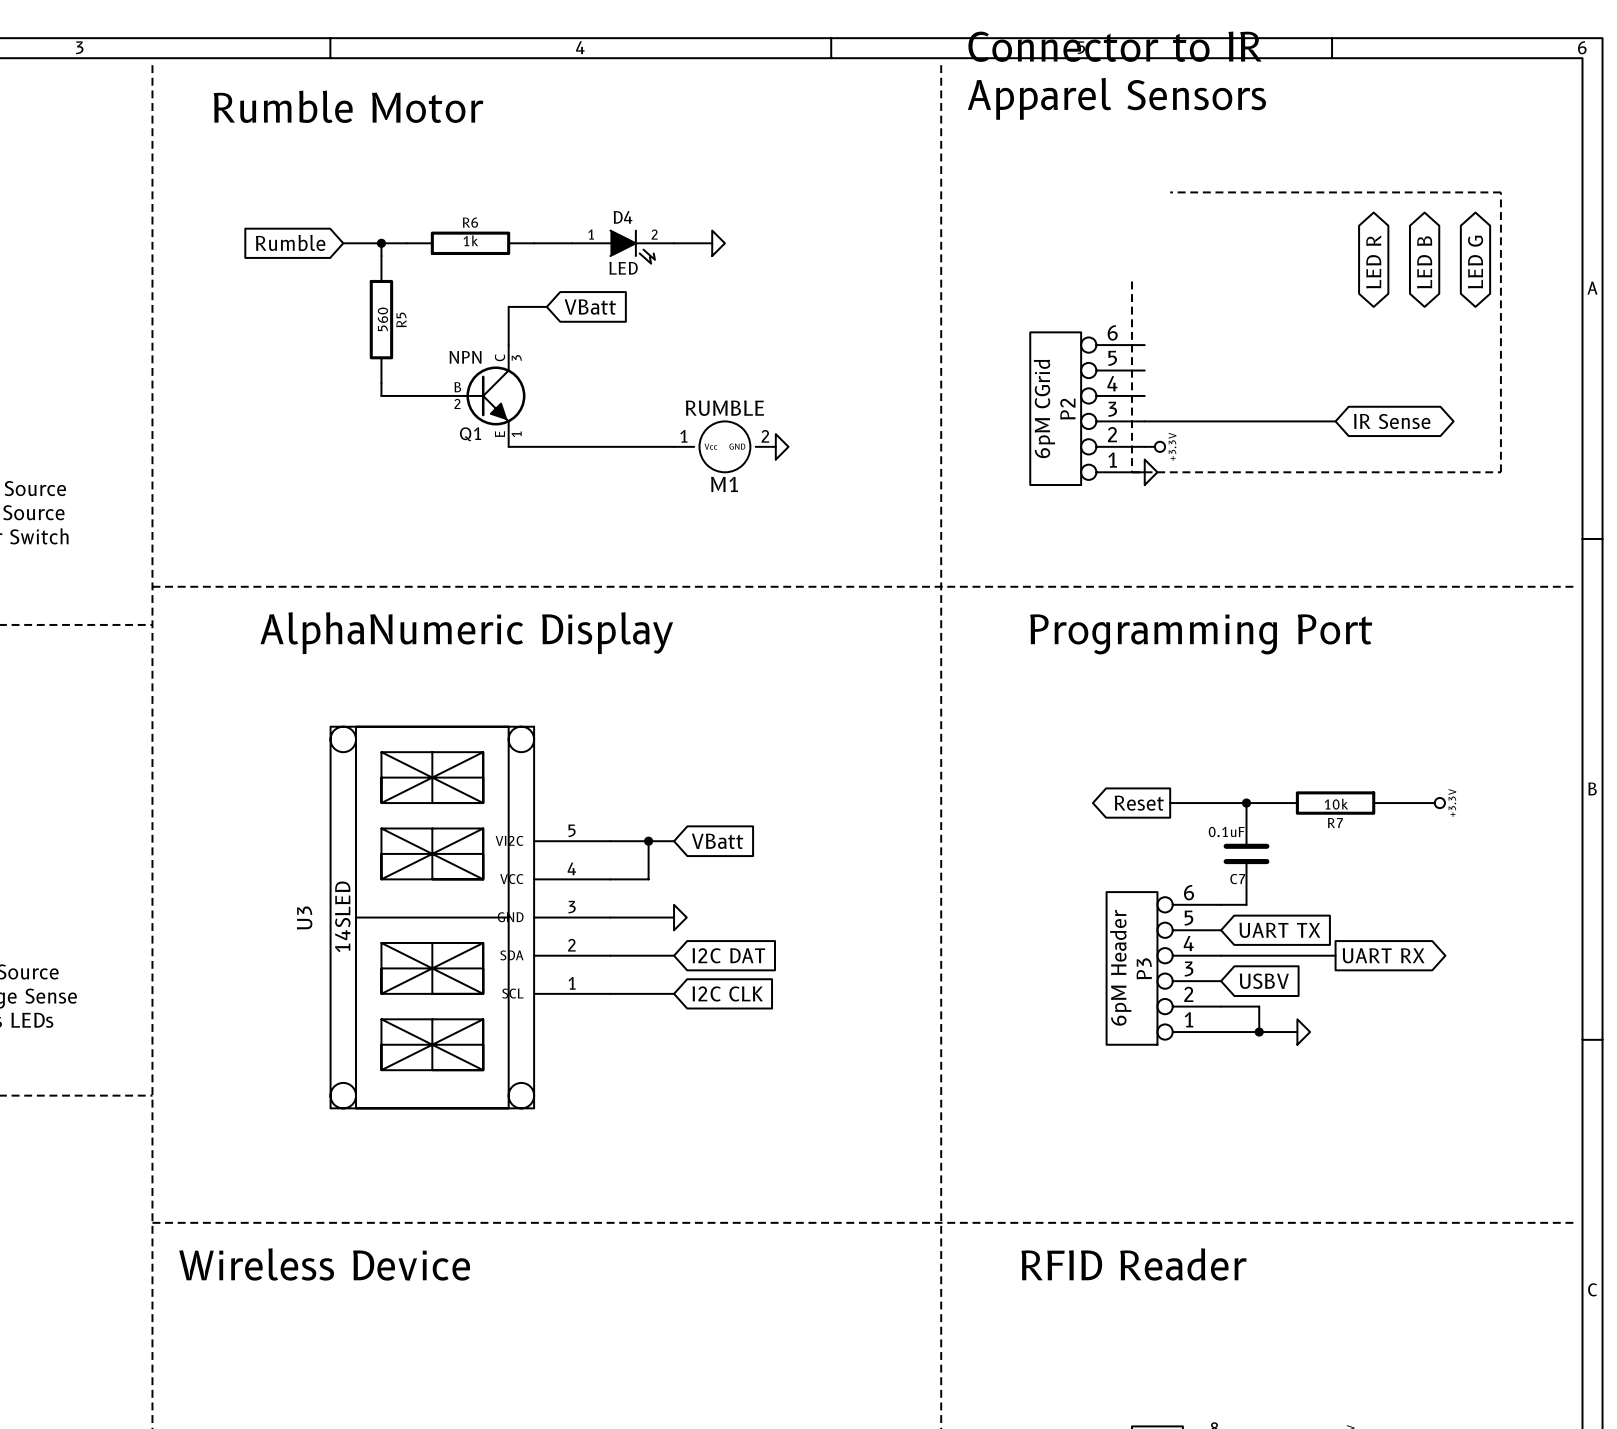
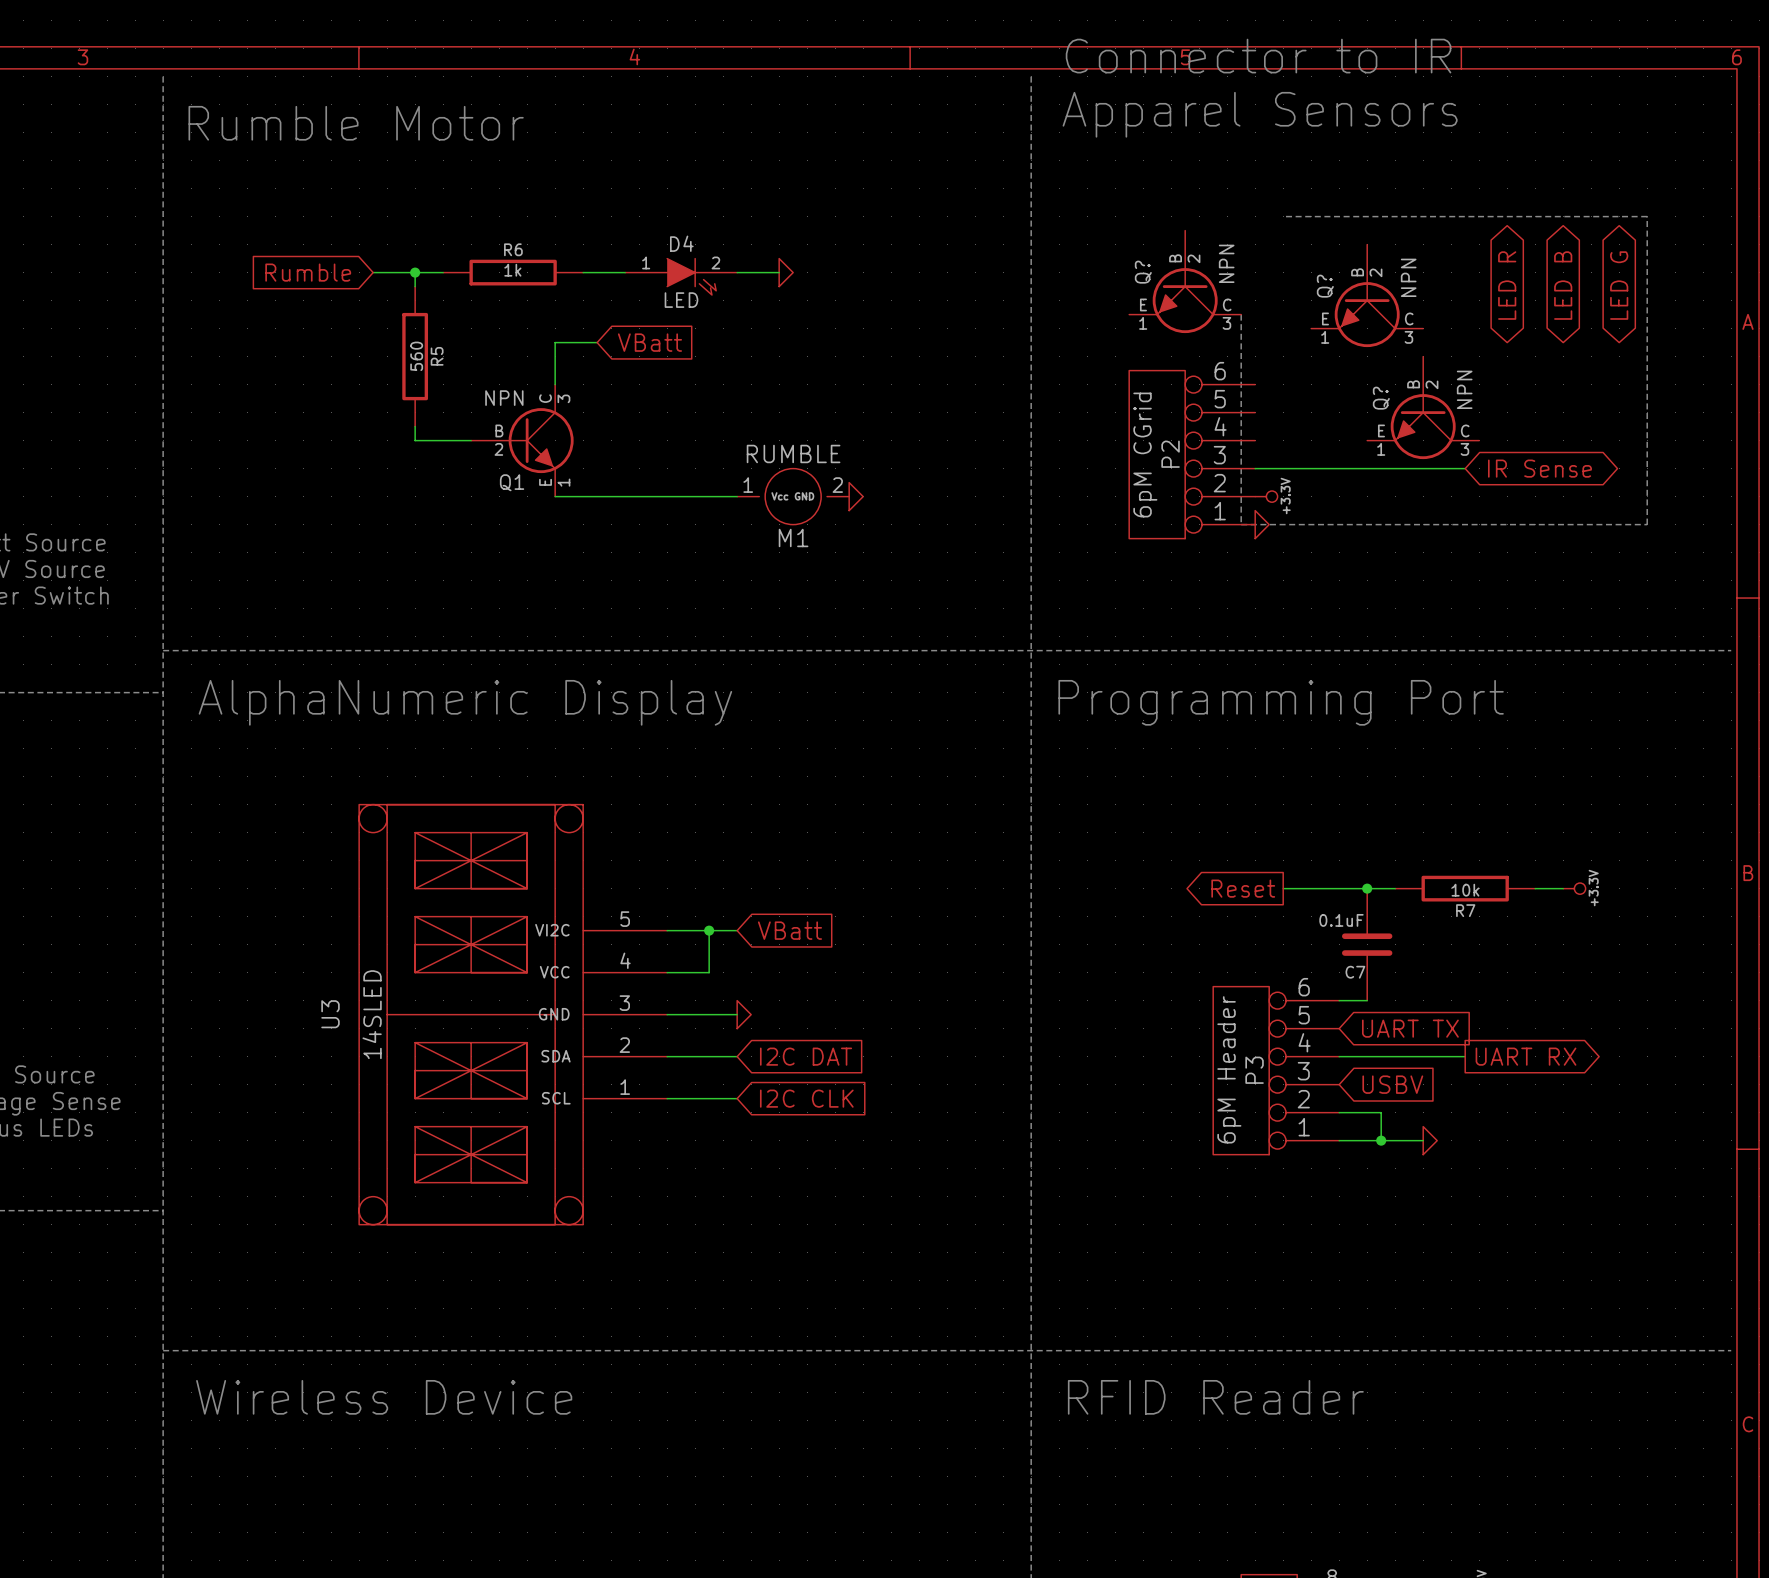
Q?: none -> NPN (1185, 281)
Q?: none -> NPN (1367, 295)
Q?: none -> NPN (1423, 407)

